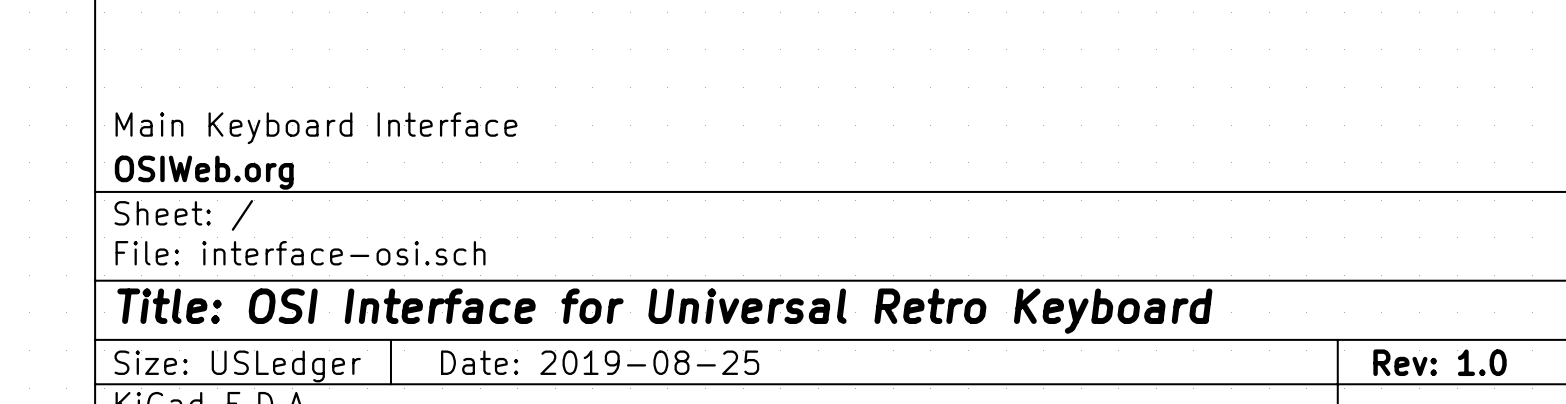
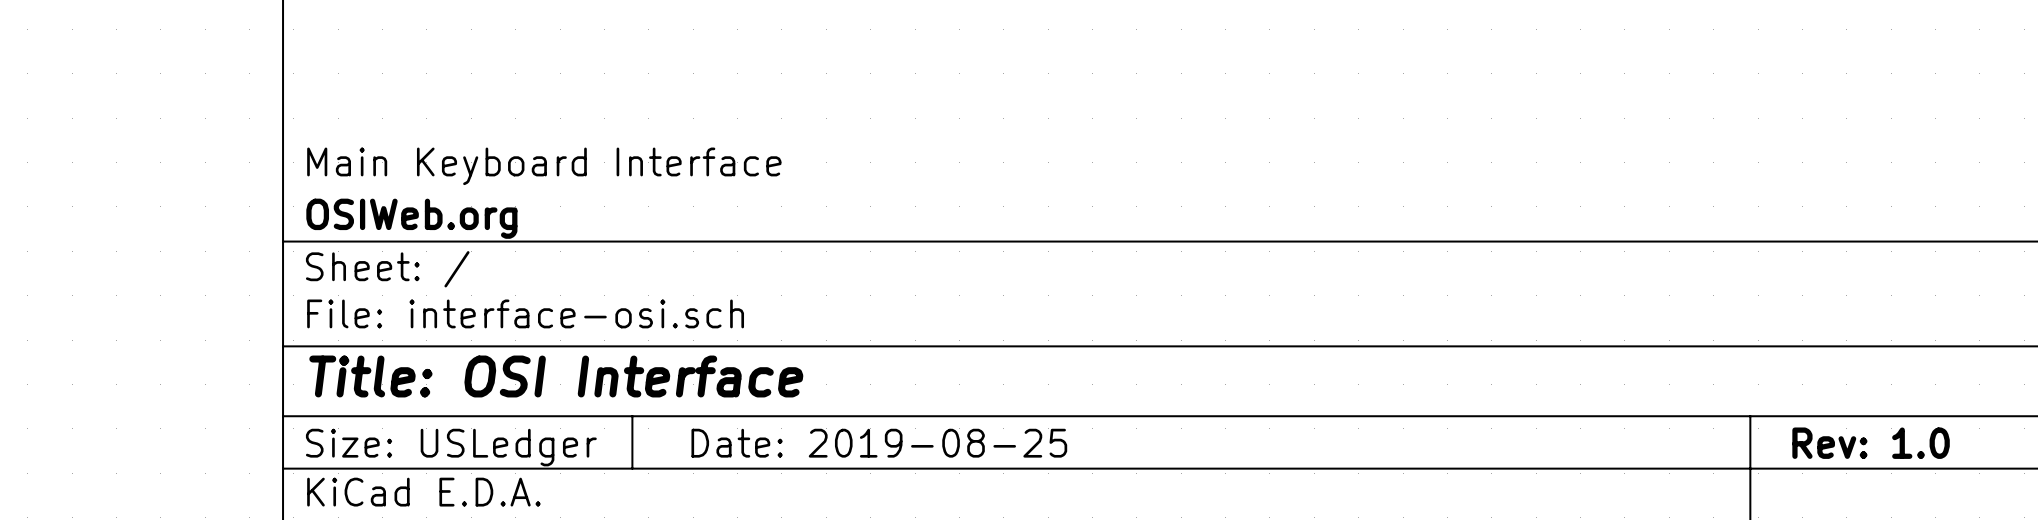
title block: Title: OSI Interface for Universal Retro Keyboard (664, 311) -> Title: OSI Interface (556, 376)

